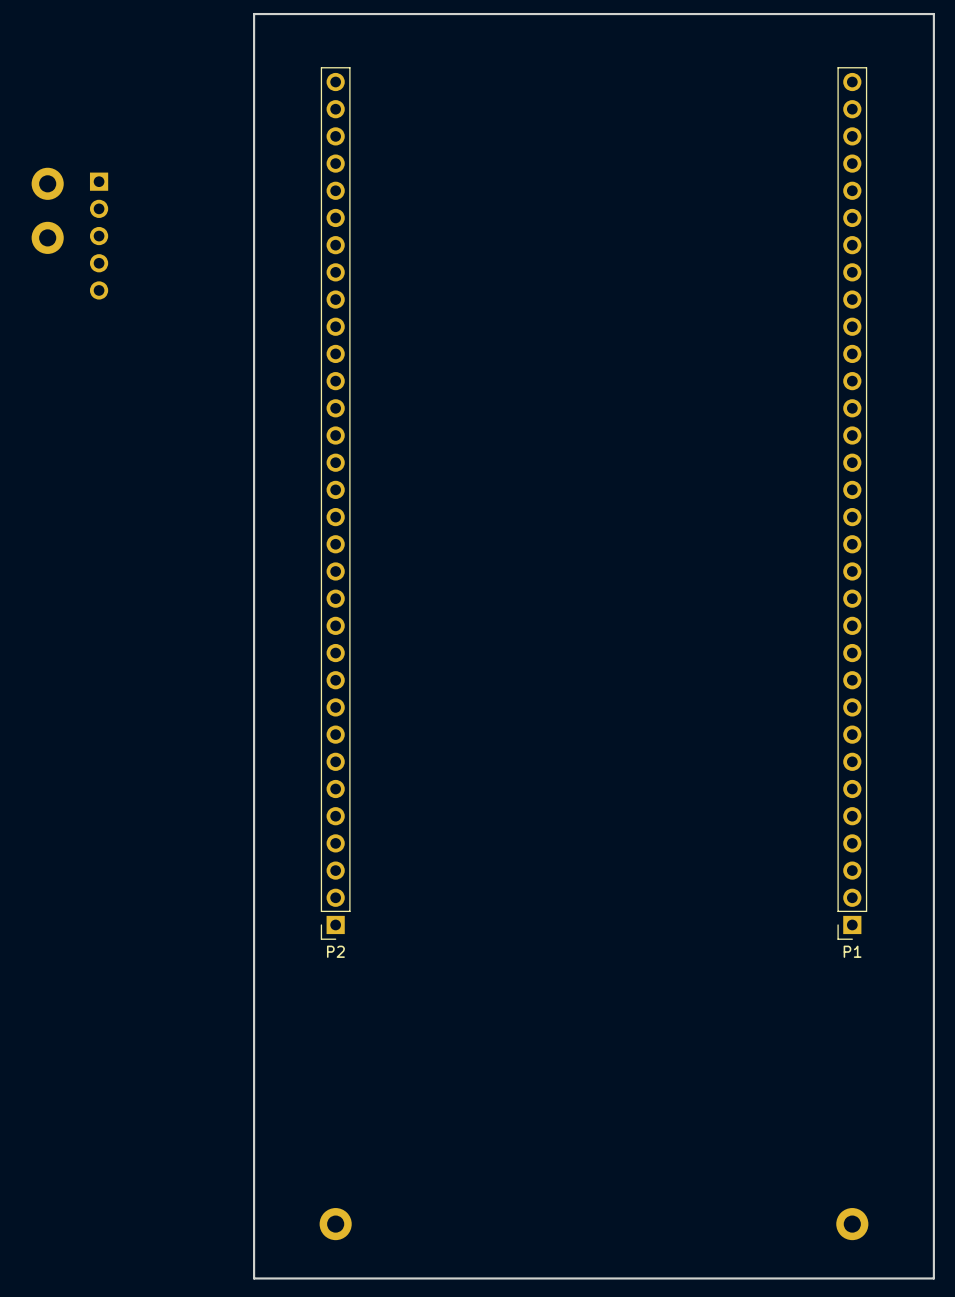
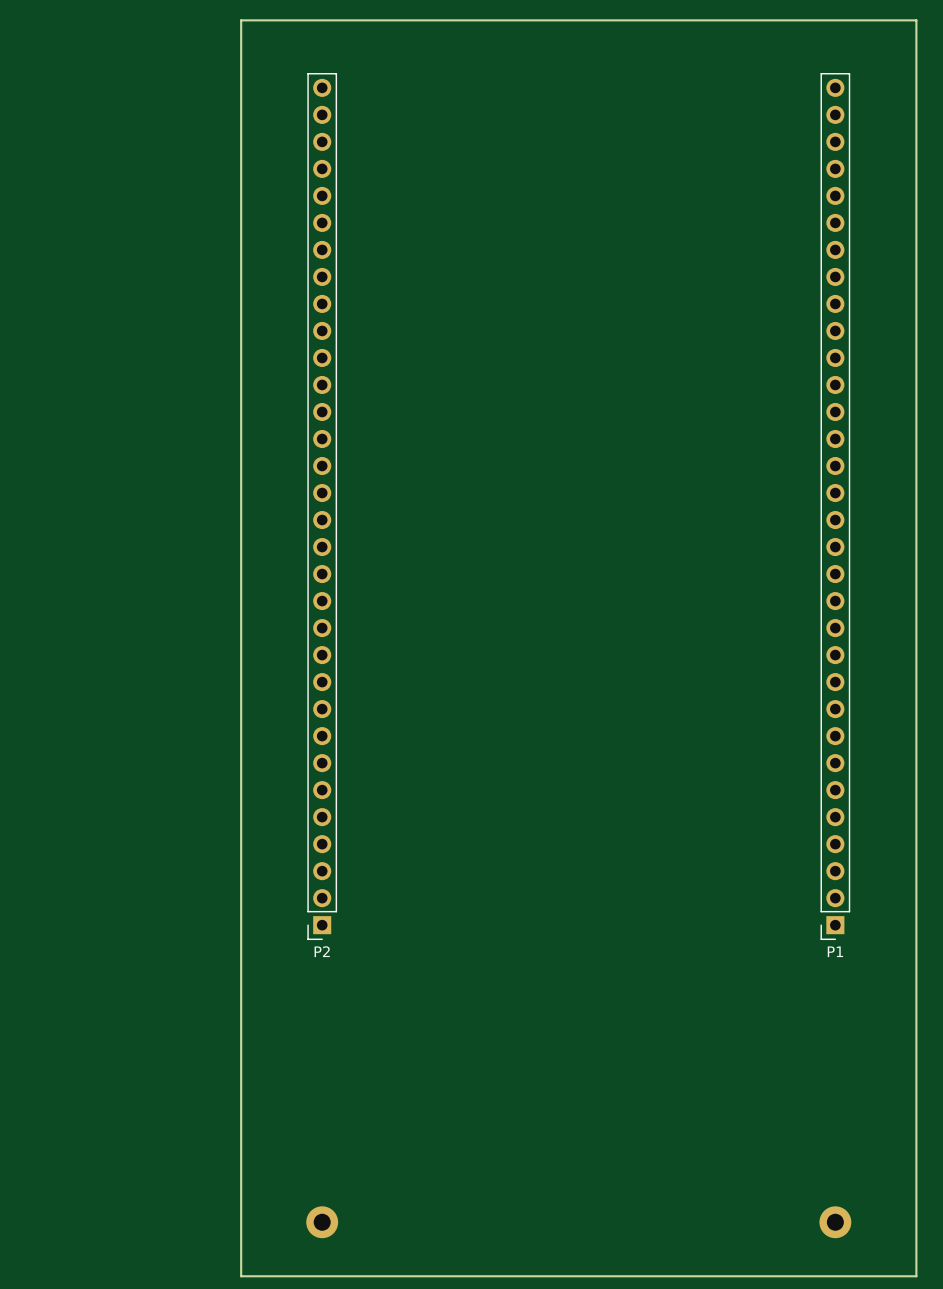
part: (47, 183) -> none
part: (99, 236) -> none
part: (47, 237) -> none

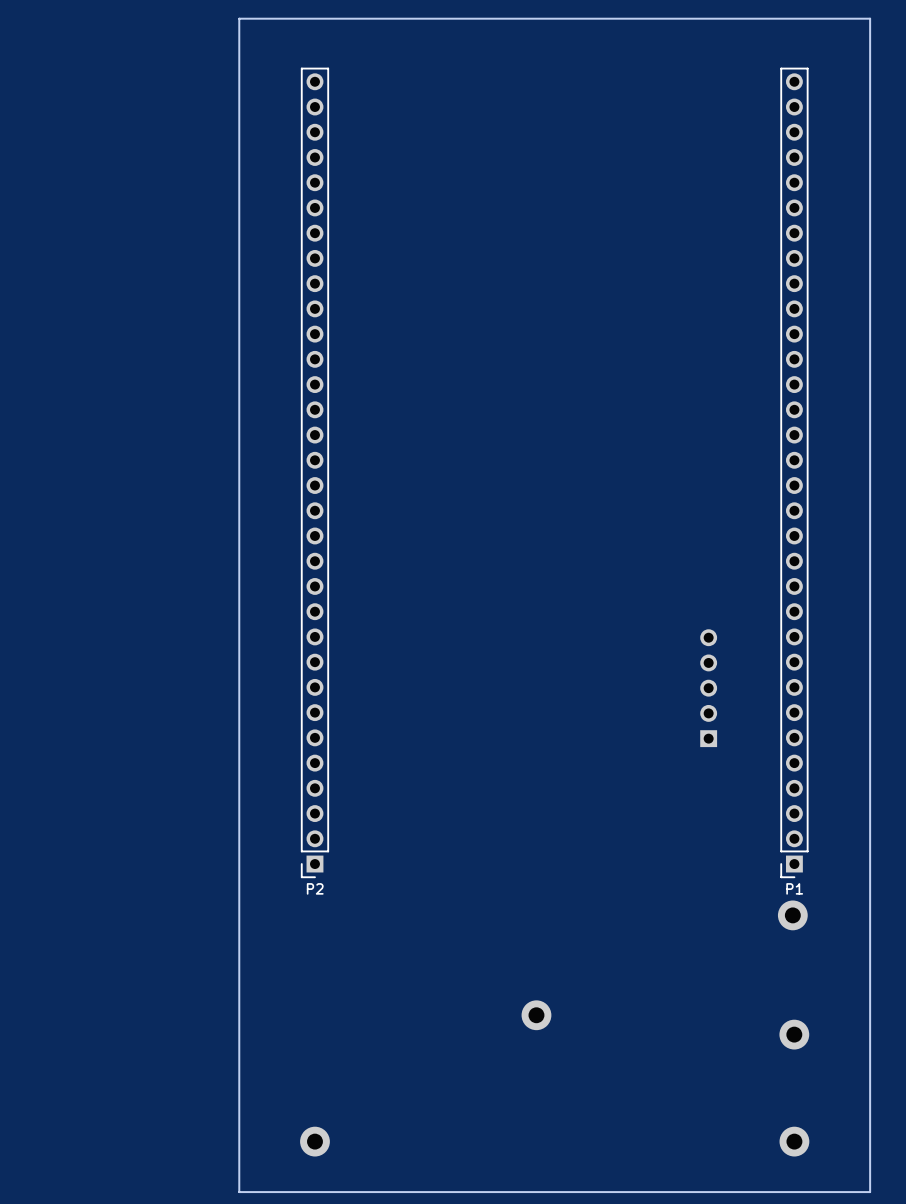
part: none -> (708, 688)
part: none -> (792, 915)
part: none -> (536, 1015)
part: none -> (794, 1034)

